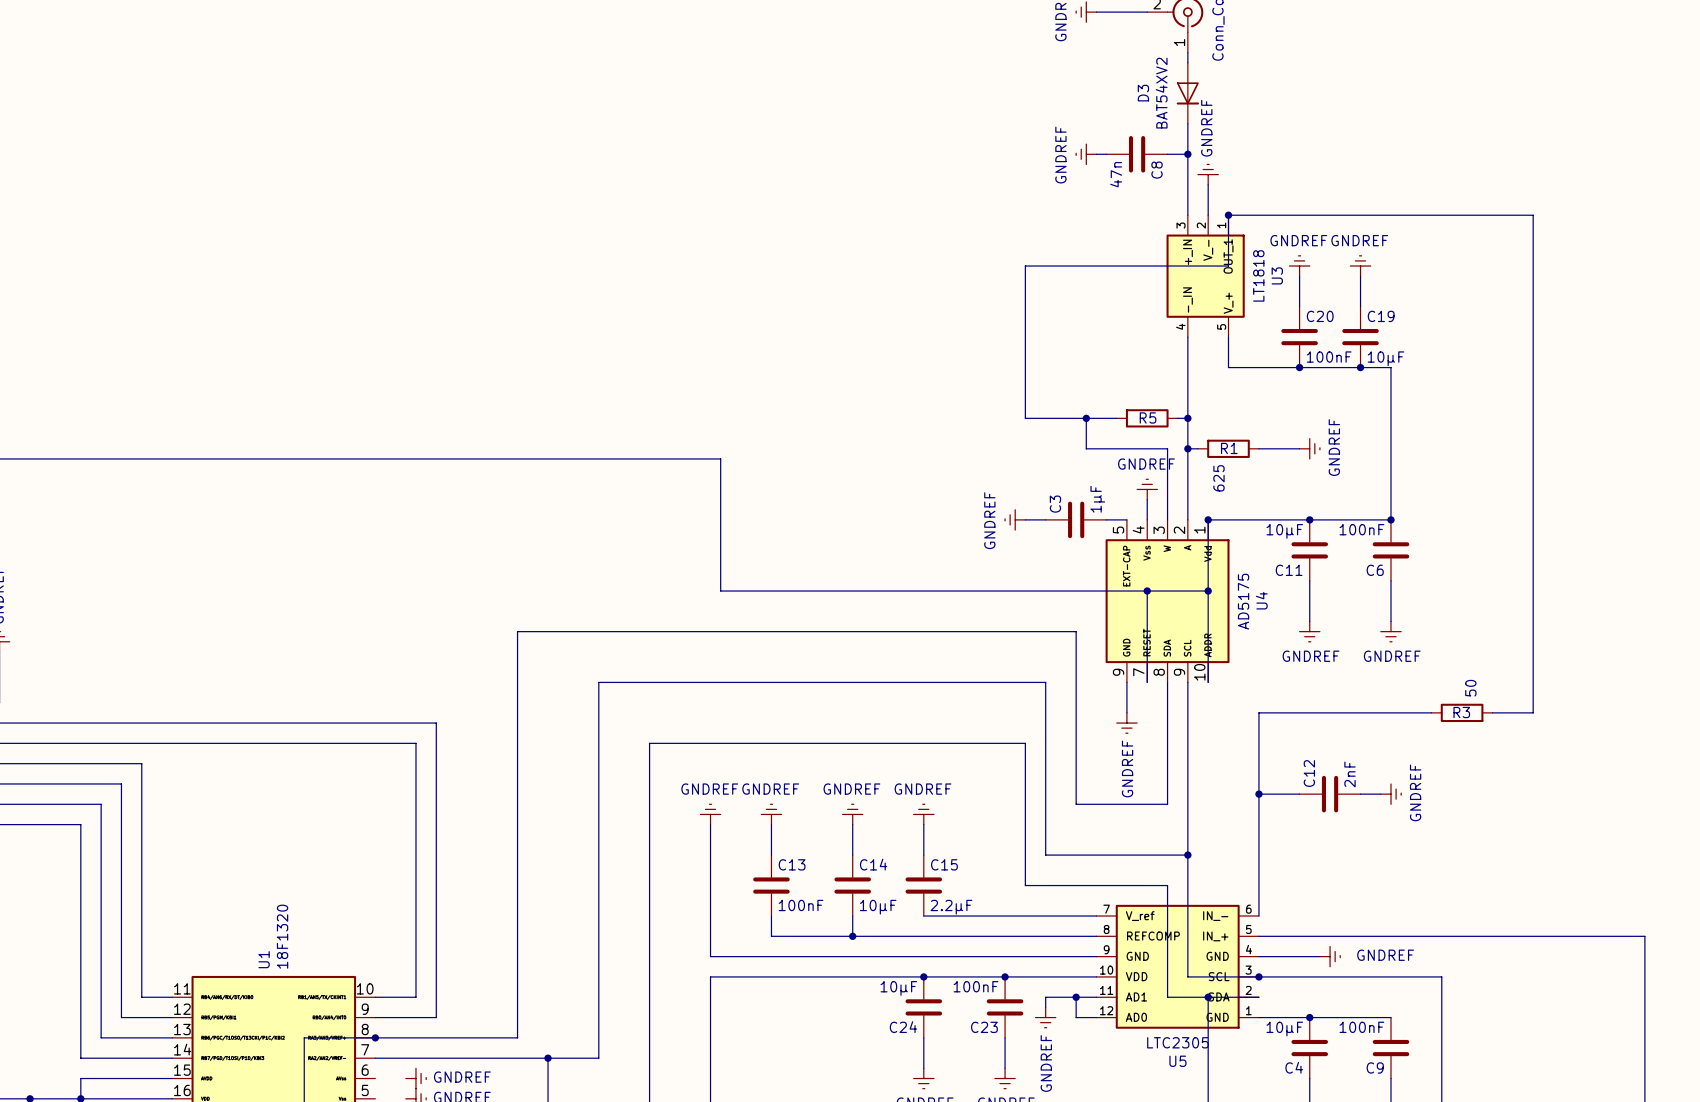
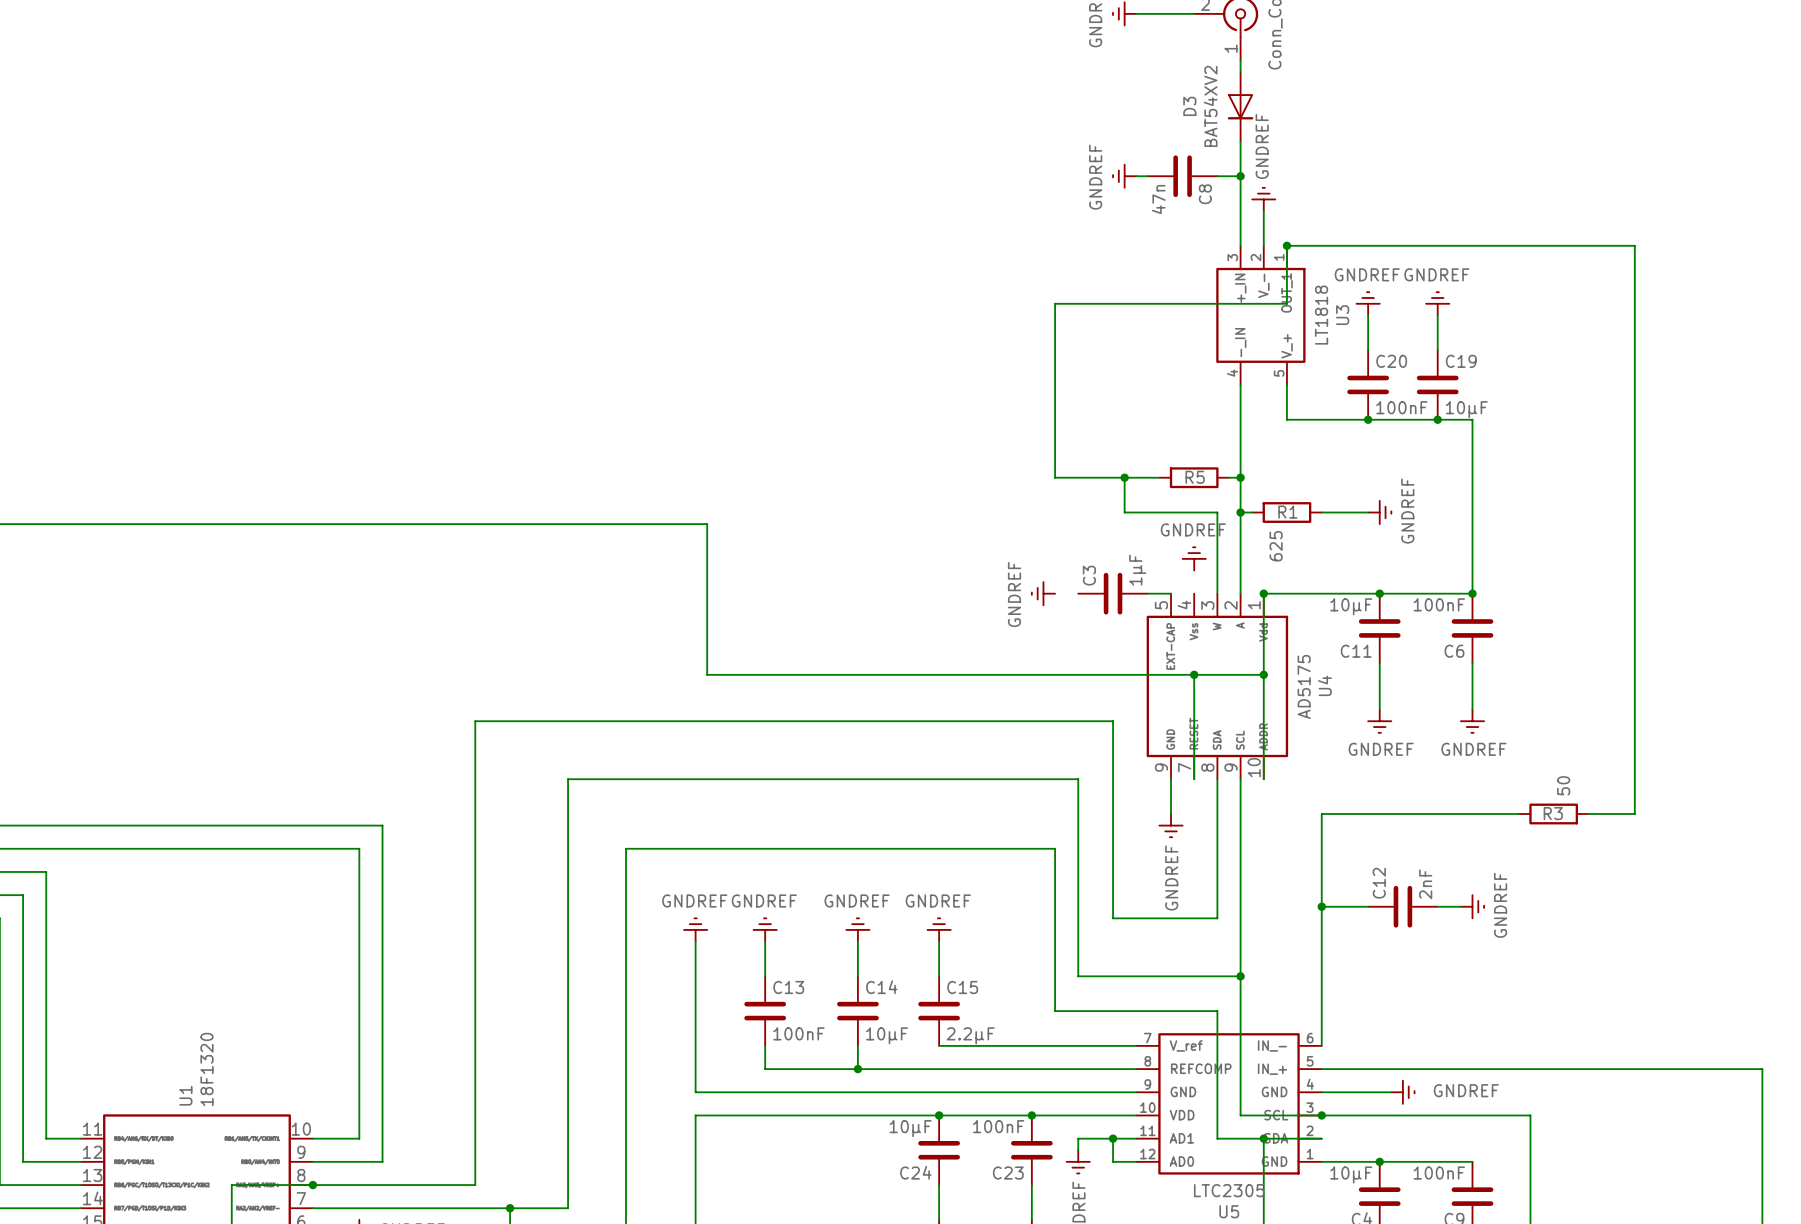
wire: (1147, 499) (1147, 519) -> none
wire: (1025, 519) (1045, 519) -> none

